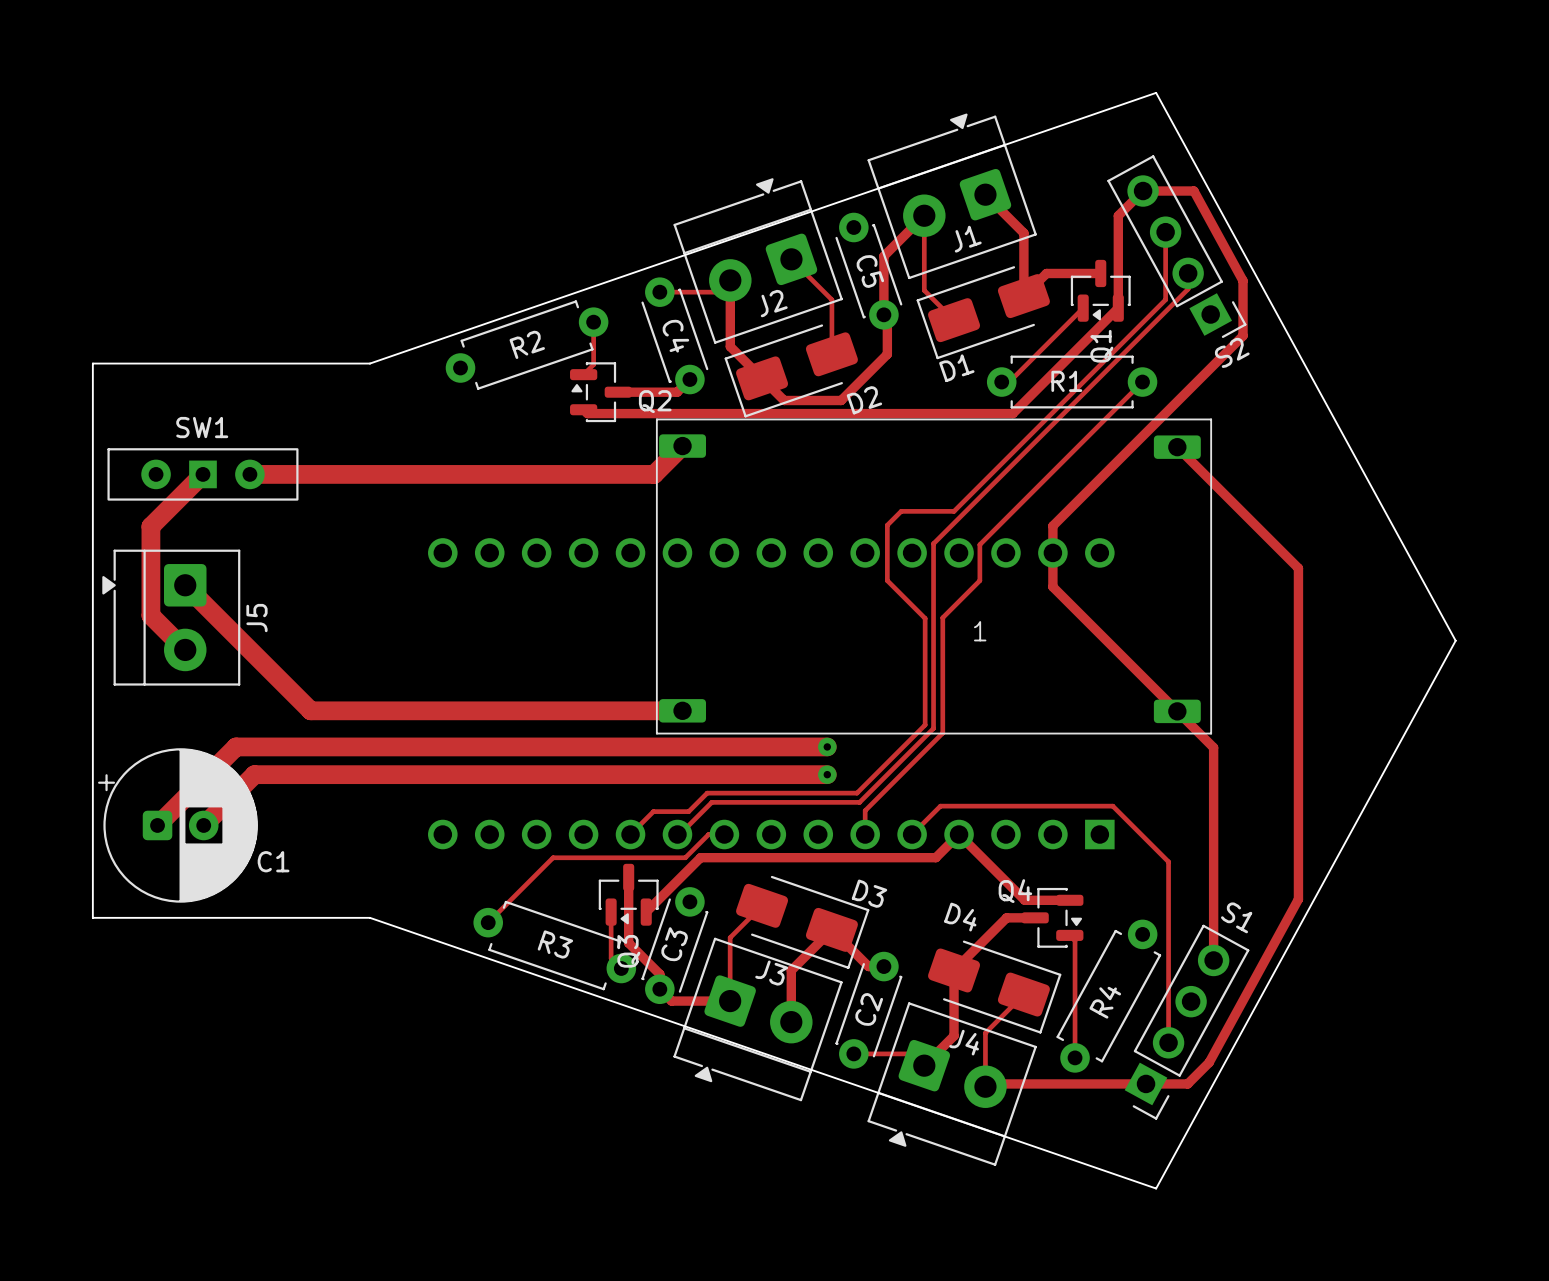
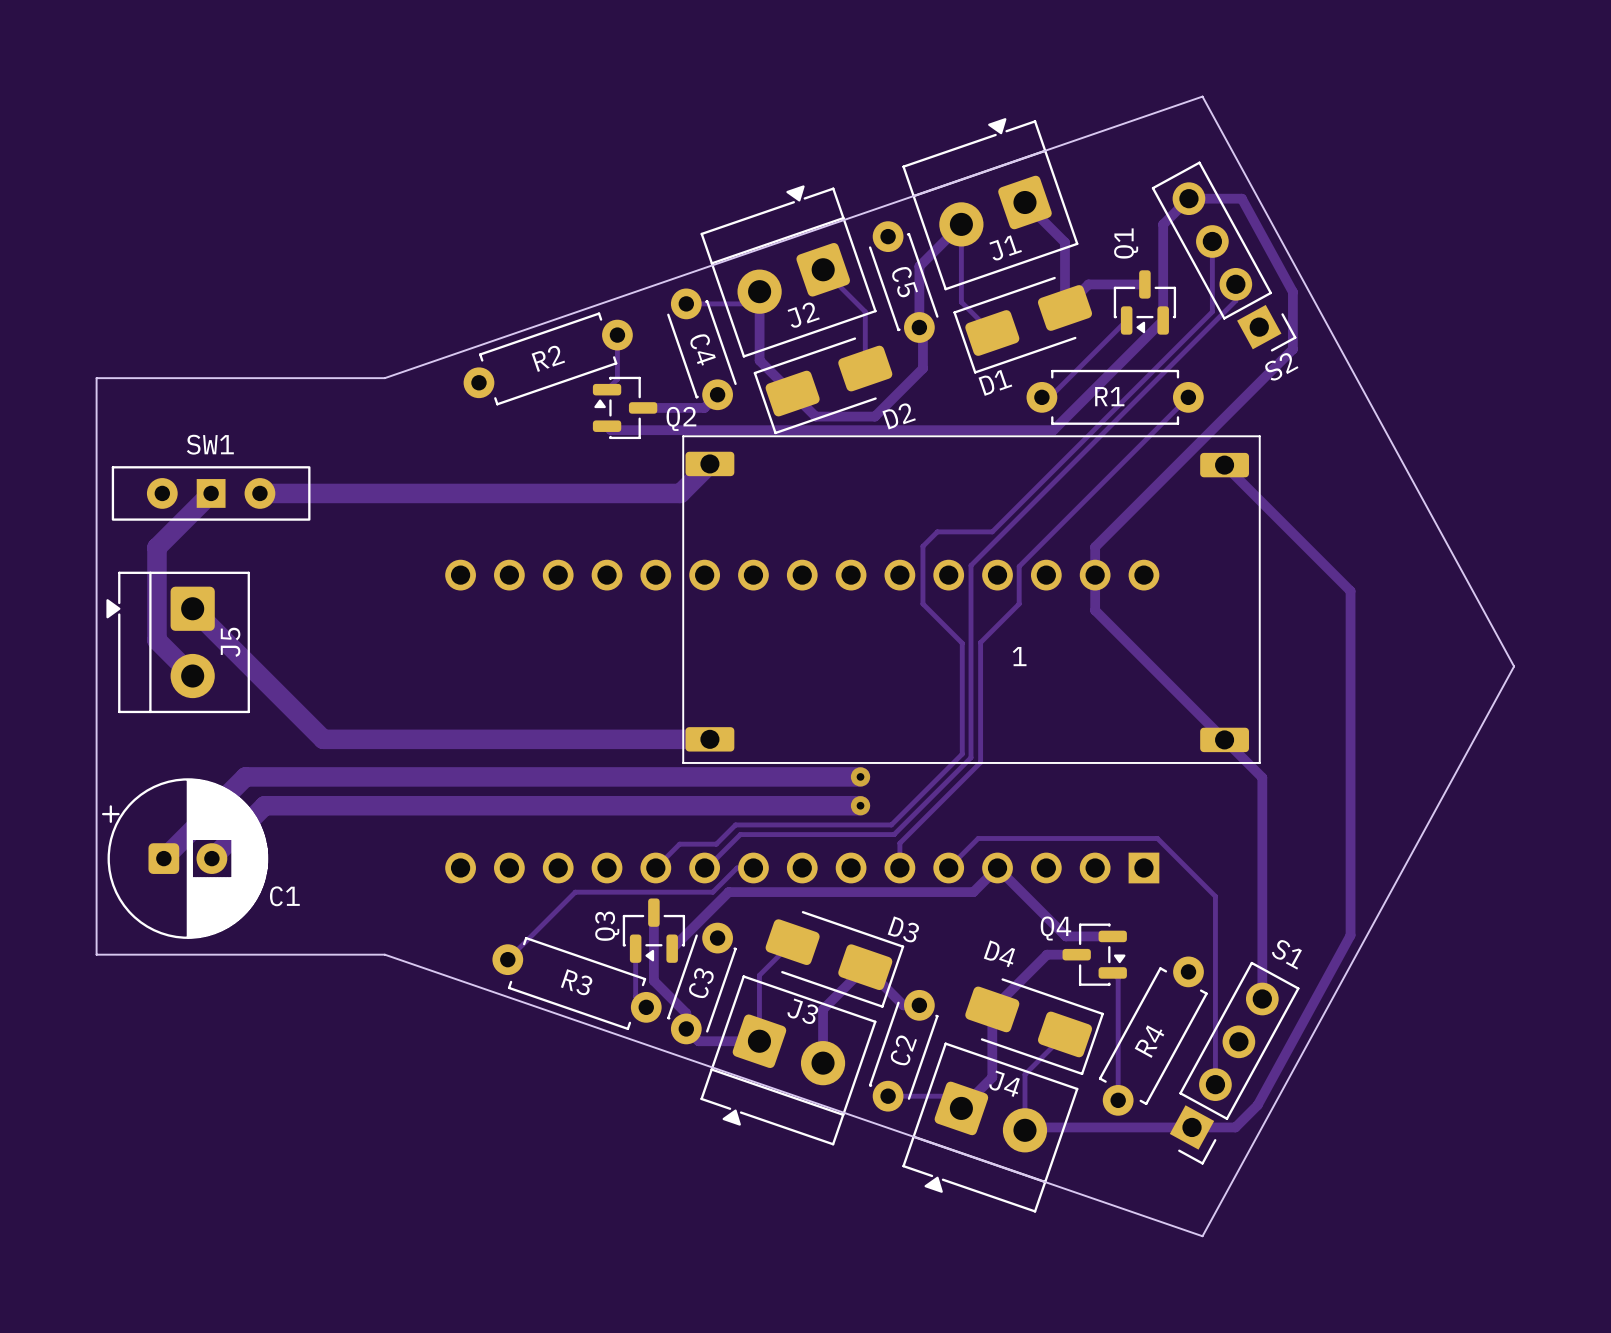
Q1 name position: Q1 (1101, 346) -> Q1 (1126, 243)
J5 name position: J5 (256, 618) -> J5 (230, 642)
Q3 name position: Q3 (628, 951) -> Q3 (607, 926)

